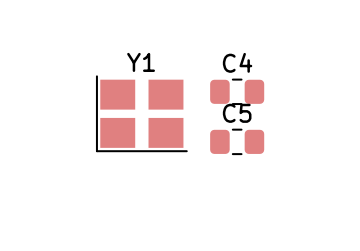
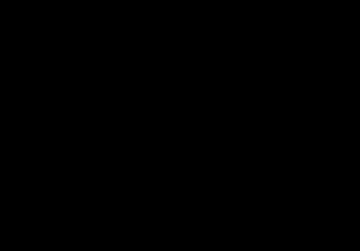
C4: (237, 91) -> none
Y1: (141, 113) -> none
C5: (237, 141) -> none

